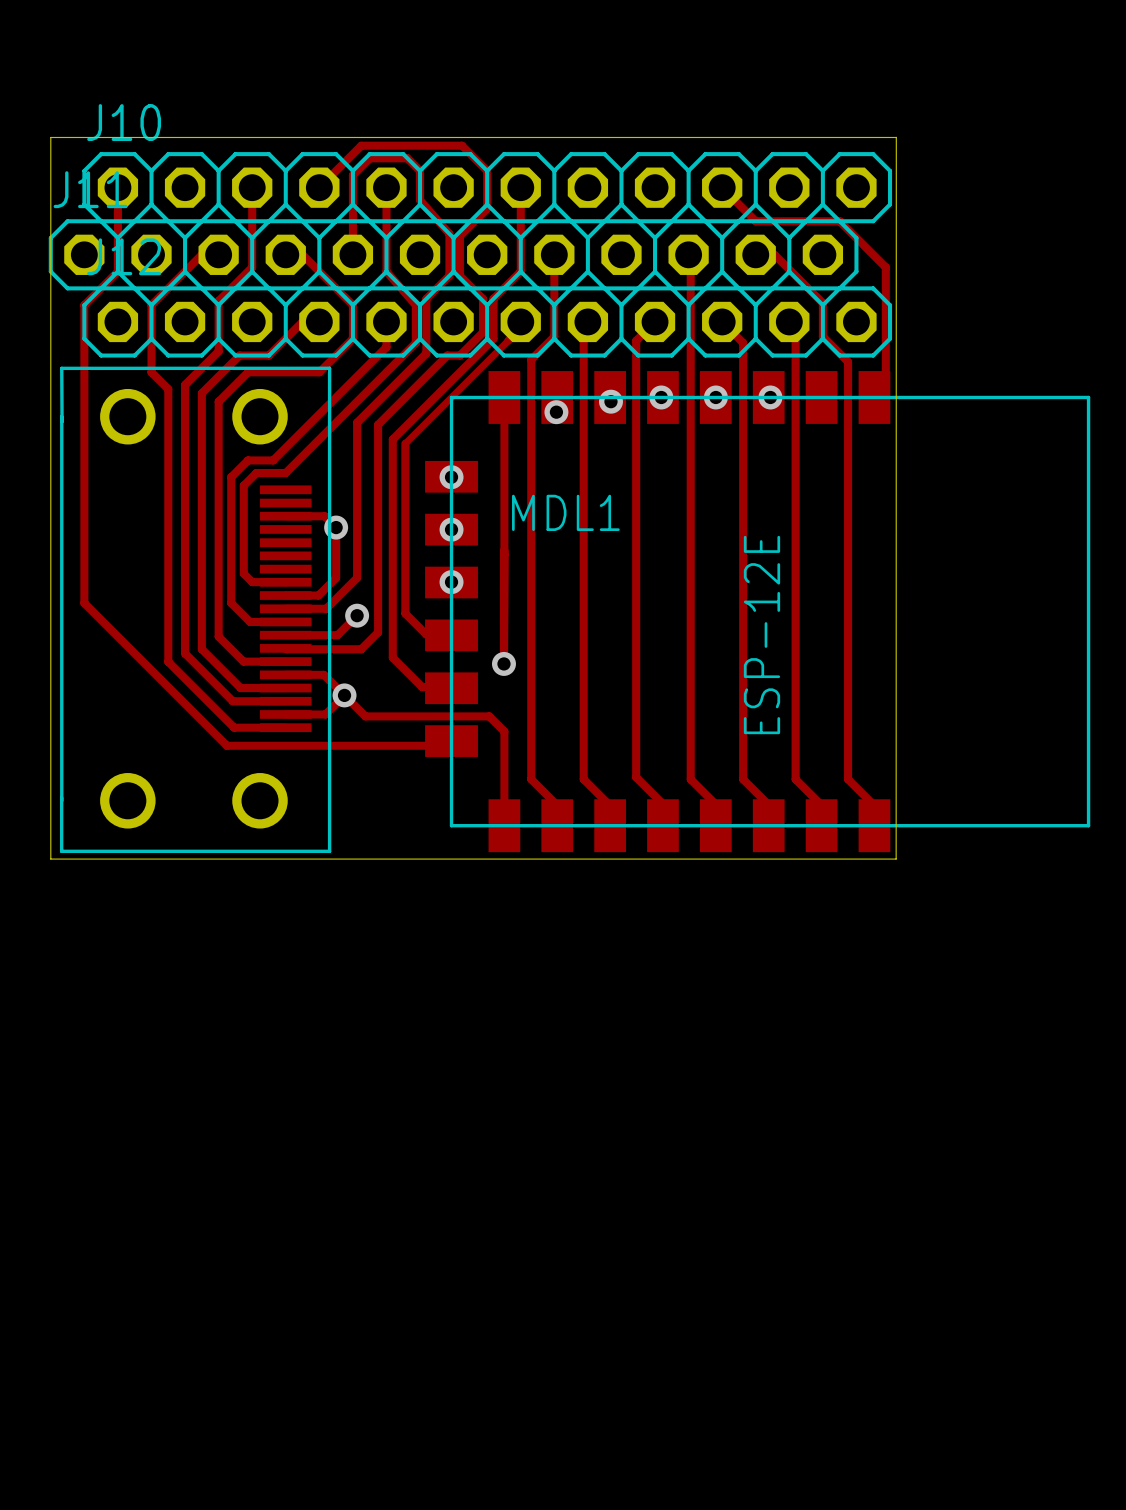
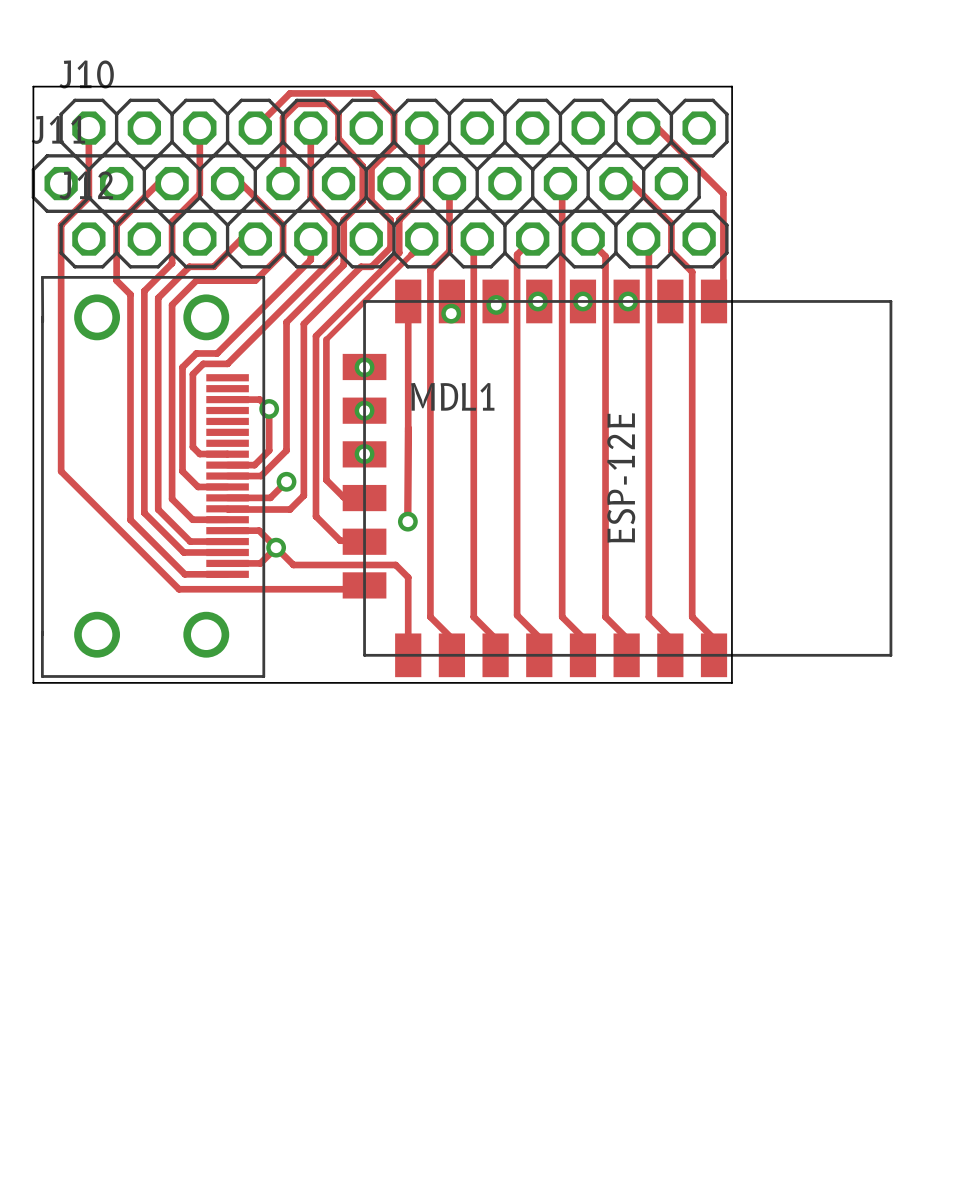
track: (722, 187) (755, 221) (839, 221) -> (643, 128) (657, 128) (685, 155)

